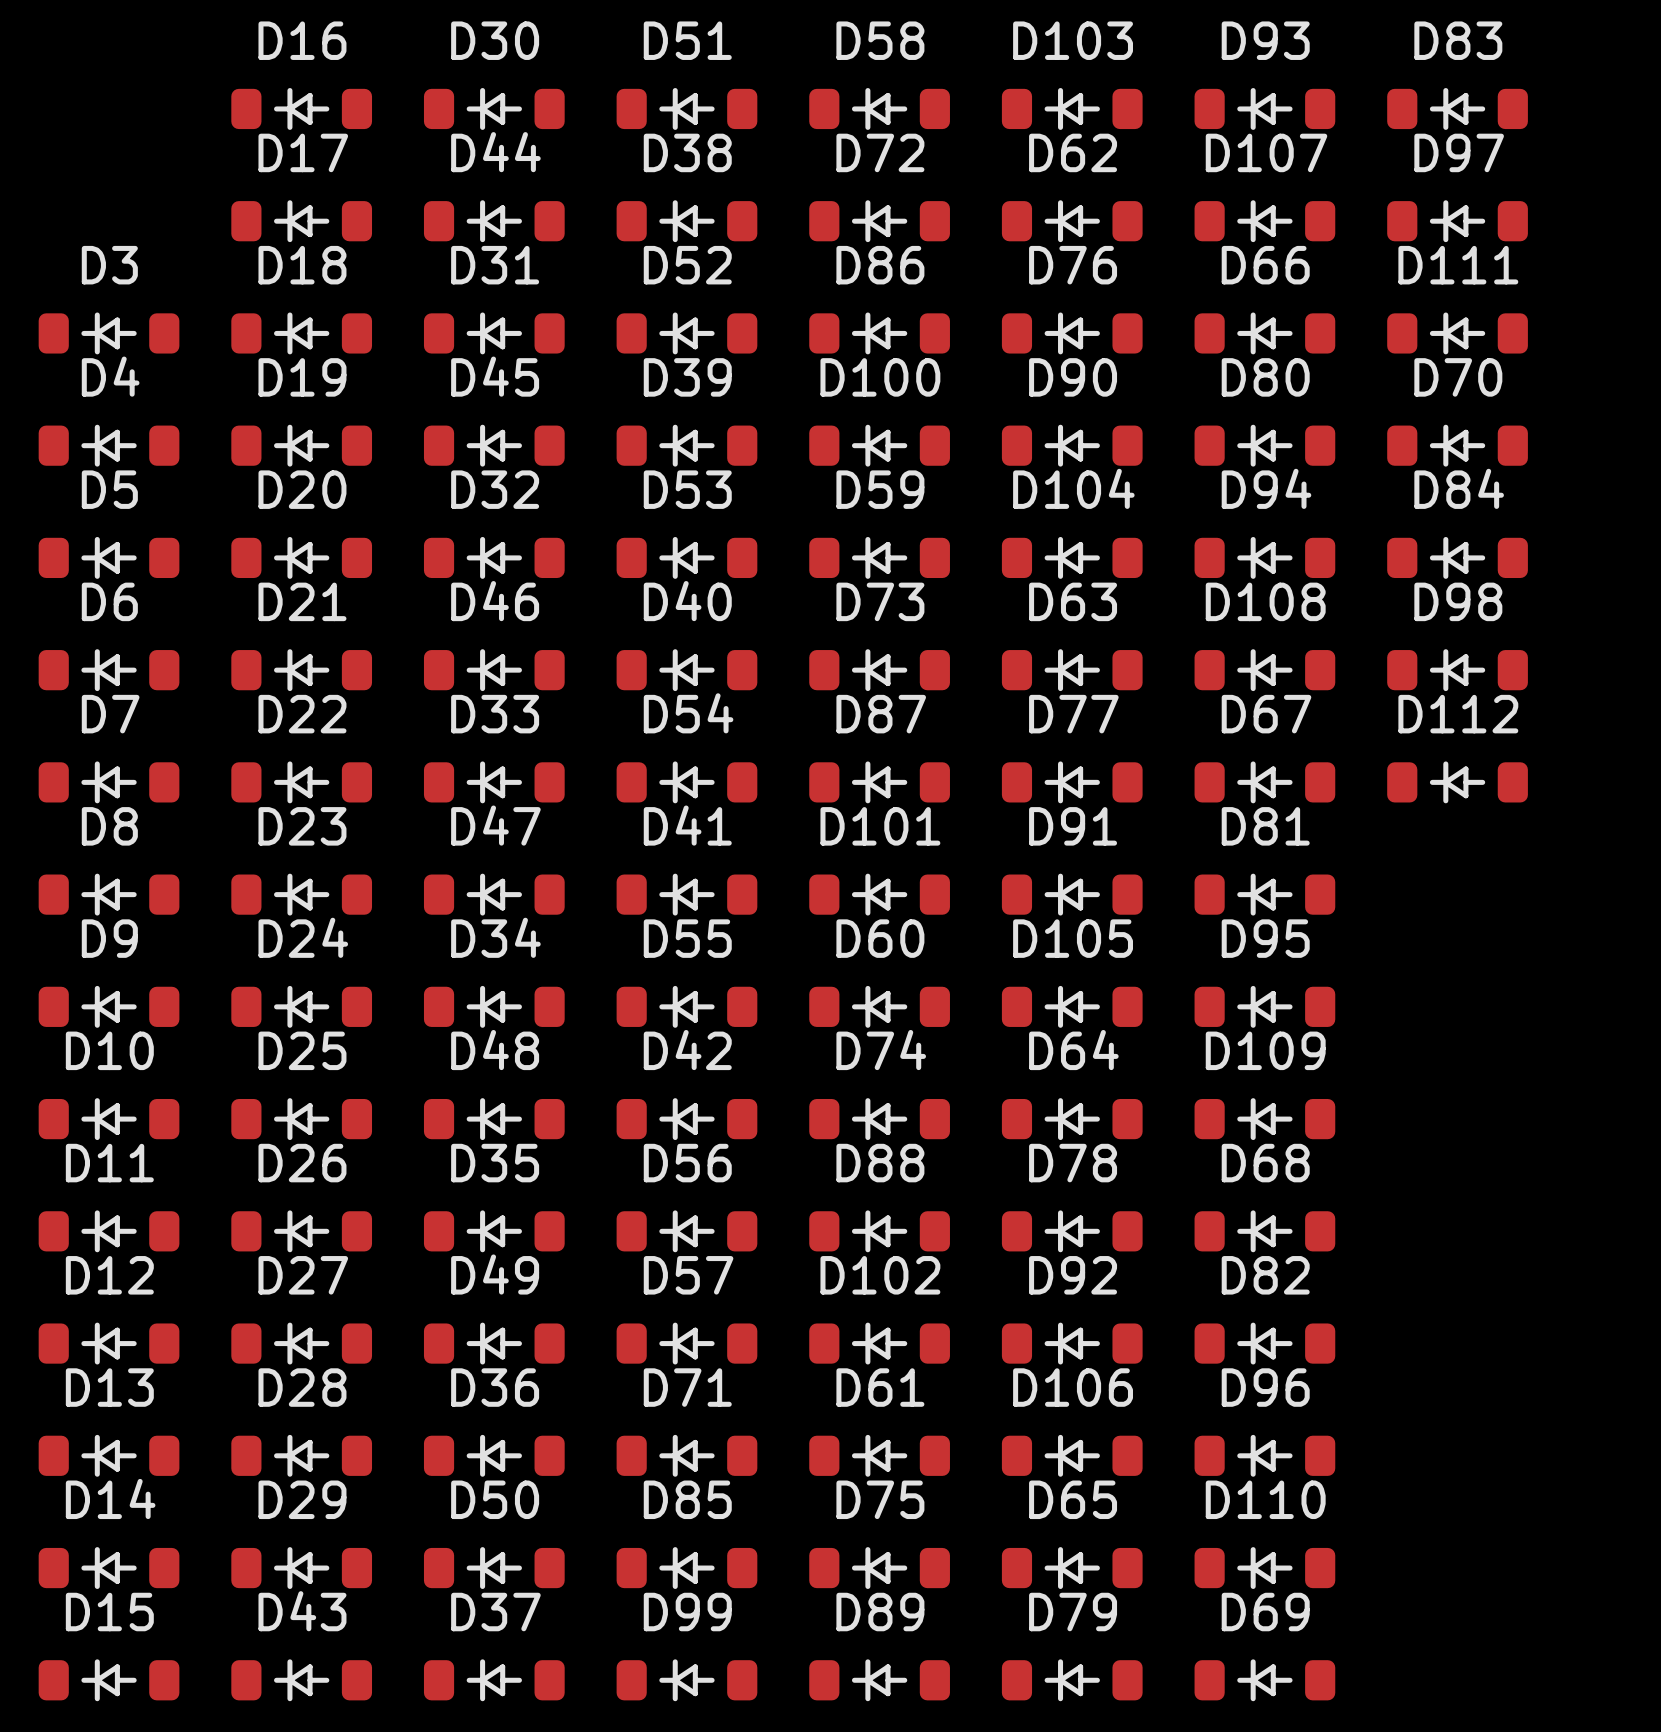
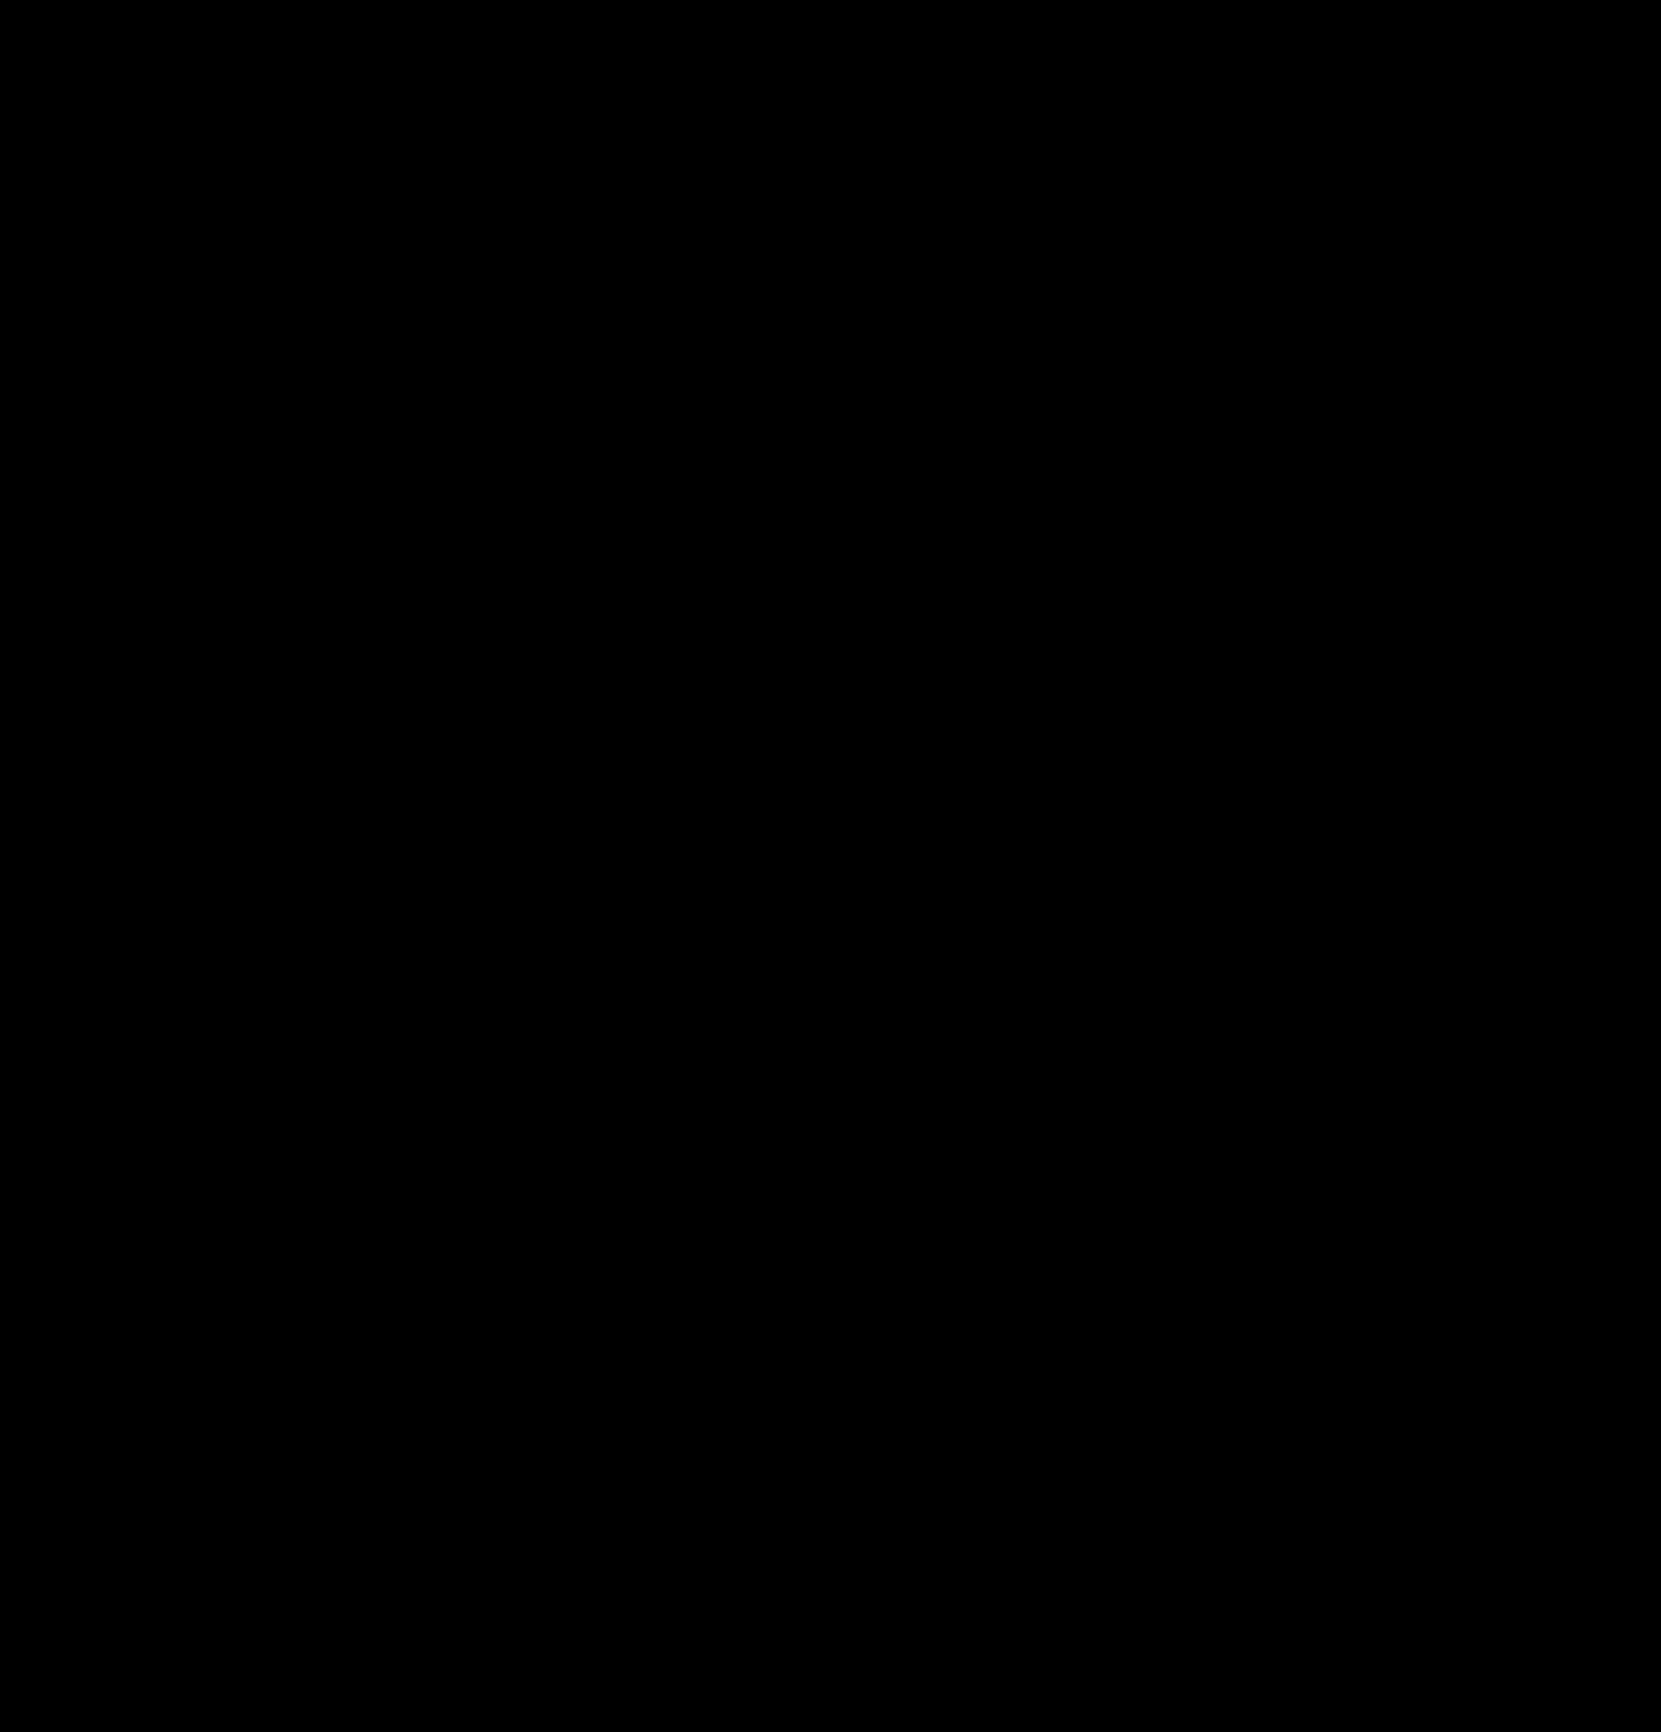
D16: (301, 108) -> none
D30: (494, 108) -> none
D51: (686, 108) -> none
D58: (879, 108) -> none
D103: (1072, 108) -> none
D93: (1264, 108) -> none
D83: (1457, 108) -> none
D17: (301, 221) -> none
D44: (494, 221) -> none
D38: (686, 221) -> none
D72: (879, 221) -> none
D62: (1072, 221) -> none
D107: (1264, 221) -> none
D97: (1457, 221) -> none
D3: (109, 333) -> none
D18: (301, 333) -> none
D31: (494, 333) -> none
D52: (686, 333) -> none
D86: (879, 333) -> none
D76: (1072, 333) -> none
D66: (1264, 333) -> none
D111: (1457, 333) -> none
D4: (109, 445) -> none
D19: (301, 445) -> none
D45: (494, 445) -> none
D39: (686, 445) -> none
D100: (879, 445) -> none
D90: (1072, 445) -> none
D80: (1264, 445) -> none
D70: (1457, 445) -> none
D5: (109, 557) -> none
D20: (301, 557) -> none
D32: (494, 557) -> none
D53: (686, 557) -> none
D59: (879, 557) -> none
D104: (1072, 557) -> none
D94: (1264, 557) -> none
D84: (1457, 557) -> none
D6: (109, 670) -> none
D21: (301, 670) -> none
D46: (494, 670) -> none
D40: (686, 670) -> none
D73: (879, 670) -> none
D63: (1072, 670) -> none
D108: (1264, 670) -> none
D98: (1457, 670) -> none
D7: (109, 782) -> none
D22: (301, 782) -> none
D33: (494, 782) -> none
D54: (686, 782) -> none
D87: (879, 782) -> none
D77: (1072, 782) -> none
D67: (1264, 782) -> none
D112: (1457, 782) -> none
D8: (109, 894) -> none
D23: (301, 894) -> none
D47: (494, 894) -> none
D41: (686, 894) -> none
D101: (879, 894) -> none
D91: (1072, 894) -> none
D81: (1264, 894) -> none
D9: (109, 1006) -> none
D24: (301, 1006) -> none
D34: (494, 1006) -> none
D55: (686, 1006) -> none
D60: (879, 1006) -> none
D105: (1072, 1006) -> none
D95: (1264, 1006) -> none
D10: (109, 1119) -> none
D25: (301, 1119) -> none
D48: (494, 1119) -> none
D42: (686, 1119) -> none
D74: (879, 1119) -> none
D64: (1072, 1119) -> none
D109: (1264, 1119) -> none
D11: (109, 1231) -> none
D26: (301, 1231) -> none
D35: (494, 1231) -> none
D56: (686, 1231) -> none
D88: (879, 1231) -> none
D78: (1072, 1231) -> none
D68: (1264, 1231) -> none
D12: (109, 1343) -> none
D27: (301, 1343) -> none
D49: (494, 1343) -> none
D57: (686, 1343) -> none
D102: (879, 1343) -> none
D92: (1072, 1343) -> none
D82: (1264, 1343) -> none
D13: (109, 1455) -> none
D28: (301, 1455) -> none
D36: (494, 1455) -> none
D71: (686, 1455) -> none
D61: (879, 1455) -> none
D106: (1072, 1455) -> none
D96: (1264, 1455) -> none
D14: (109, 1568) -> none
D29: (301, 1568) -> none
D50: (494, 1568) -> none
D85: (686, 1568) -> none
D75: (879, 1568) -> none
D65: (1072, 1568) -> none
D110: (1264, 1568) -> none
D15: (109, 1680) -> none
D43: (301, 1680) -> none
D37: (494, 1680) -> none
D99: (686, 1680) -> none
D89: (879, 1680) -> none
D79: (1072, 1680) -> none
D69: (1264, 1680) -> none

